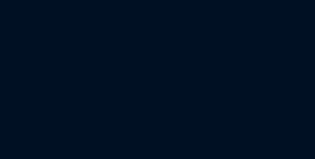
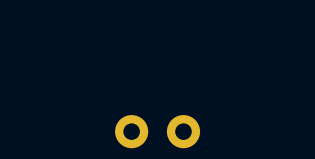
part: none -> (157, 131)

